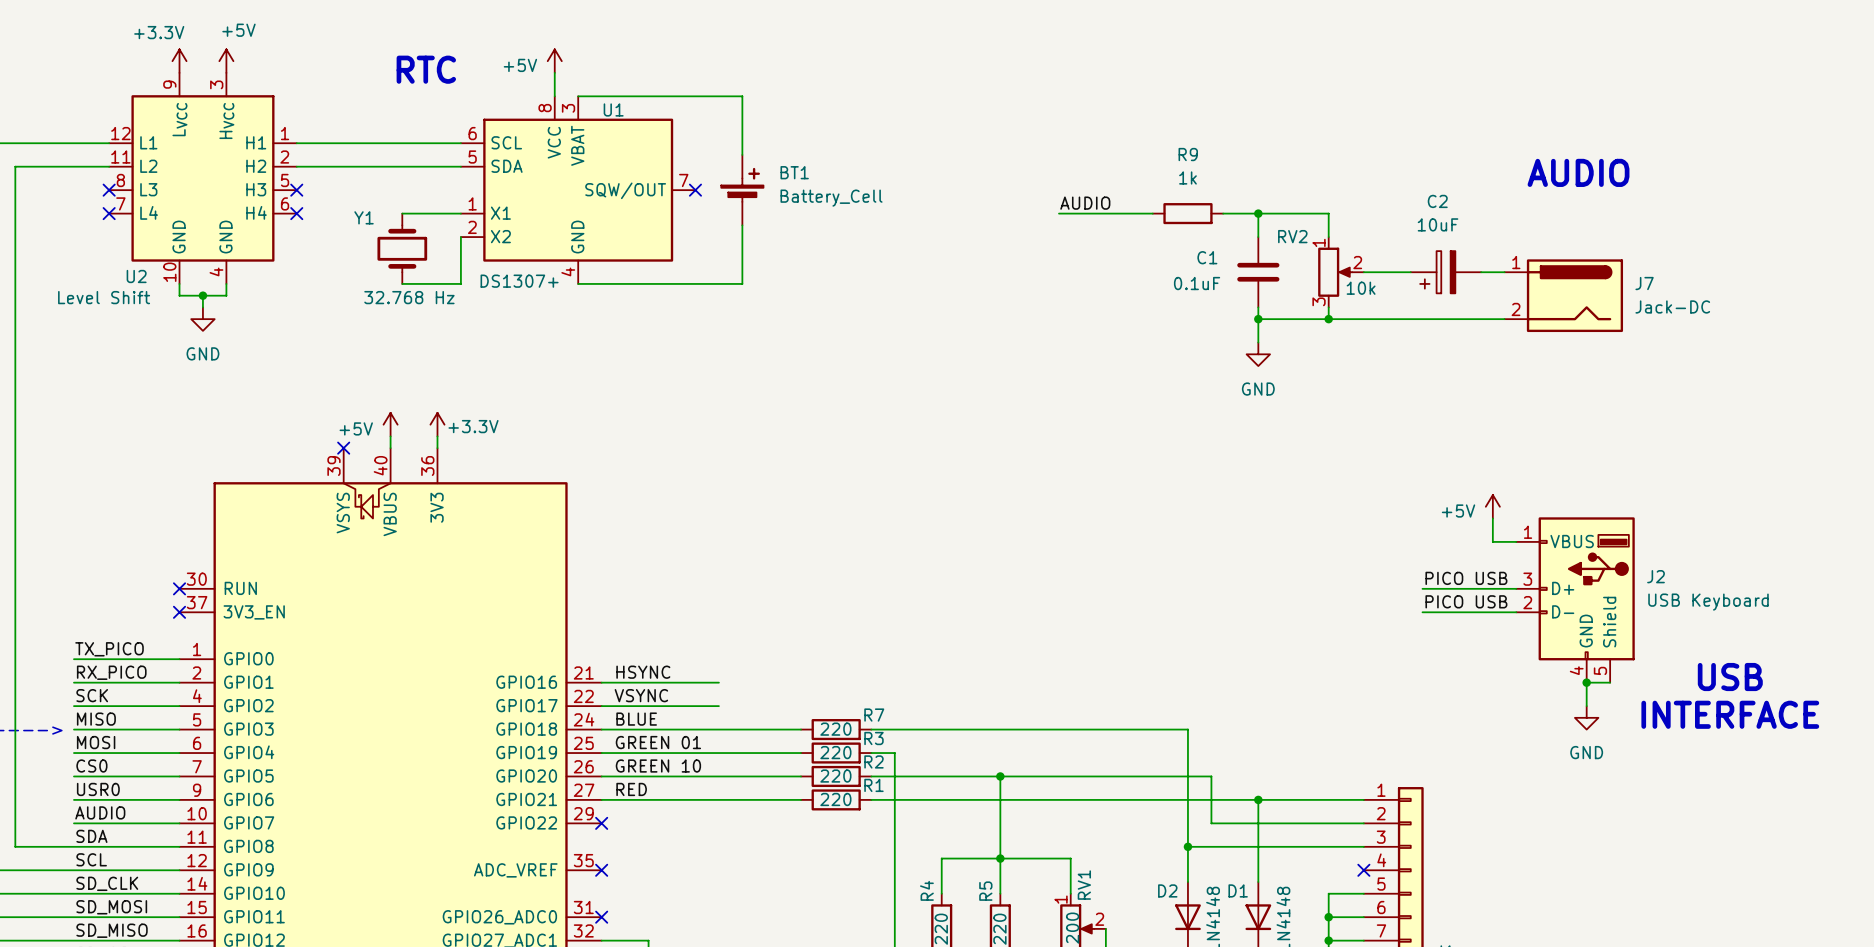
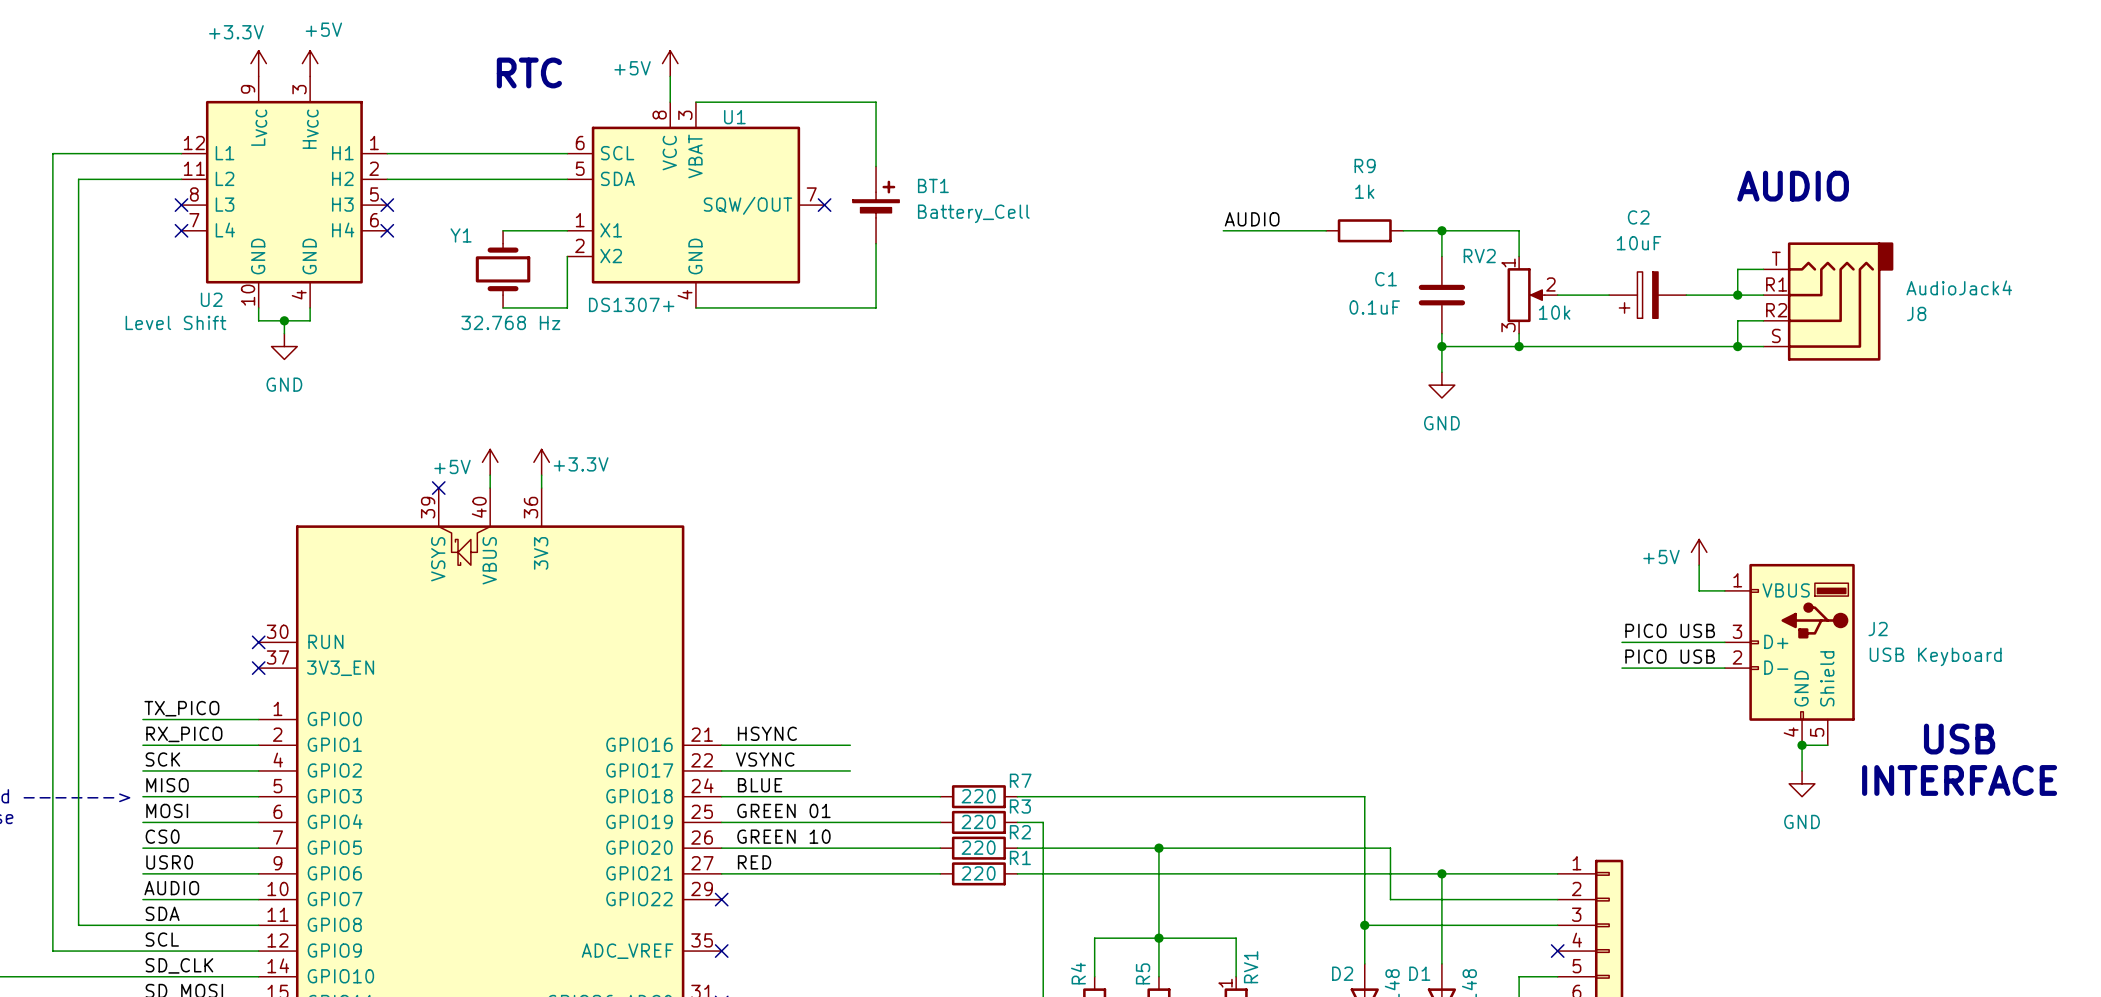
wire: none -> (1763, 269) (1737, 269) (1737, 295)
junction: none -> (1737, 295)
J8: none -> AudioJack4 (1828, 301)
J7: Jack-DC (1563, 295) -> none
junction: none -> (1737, 346)

